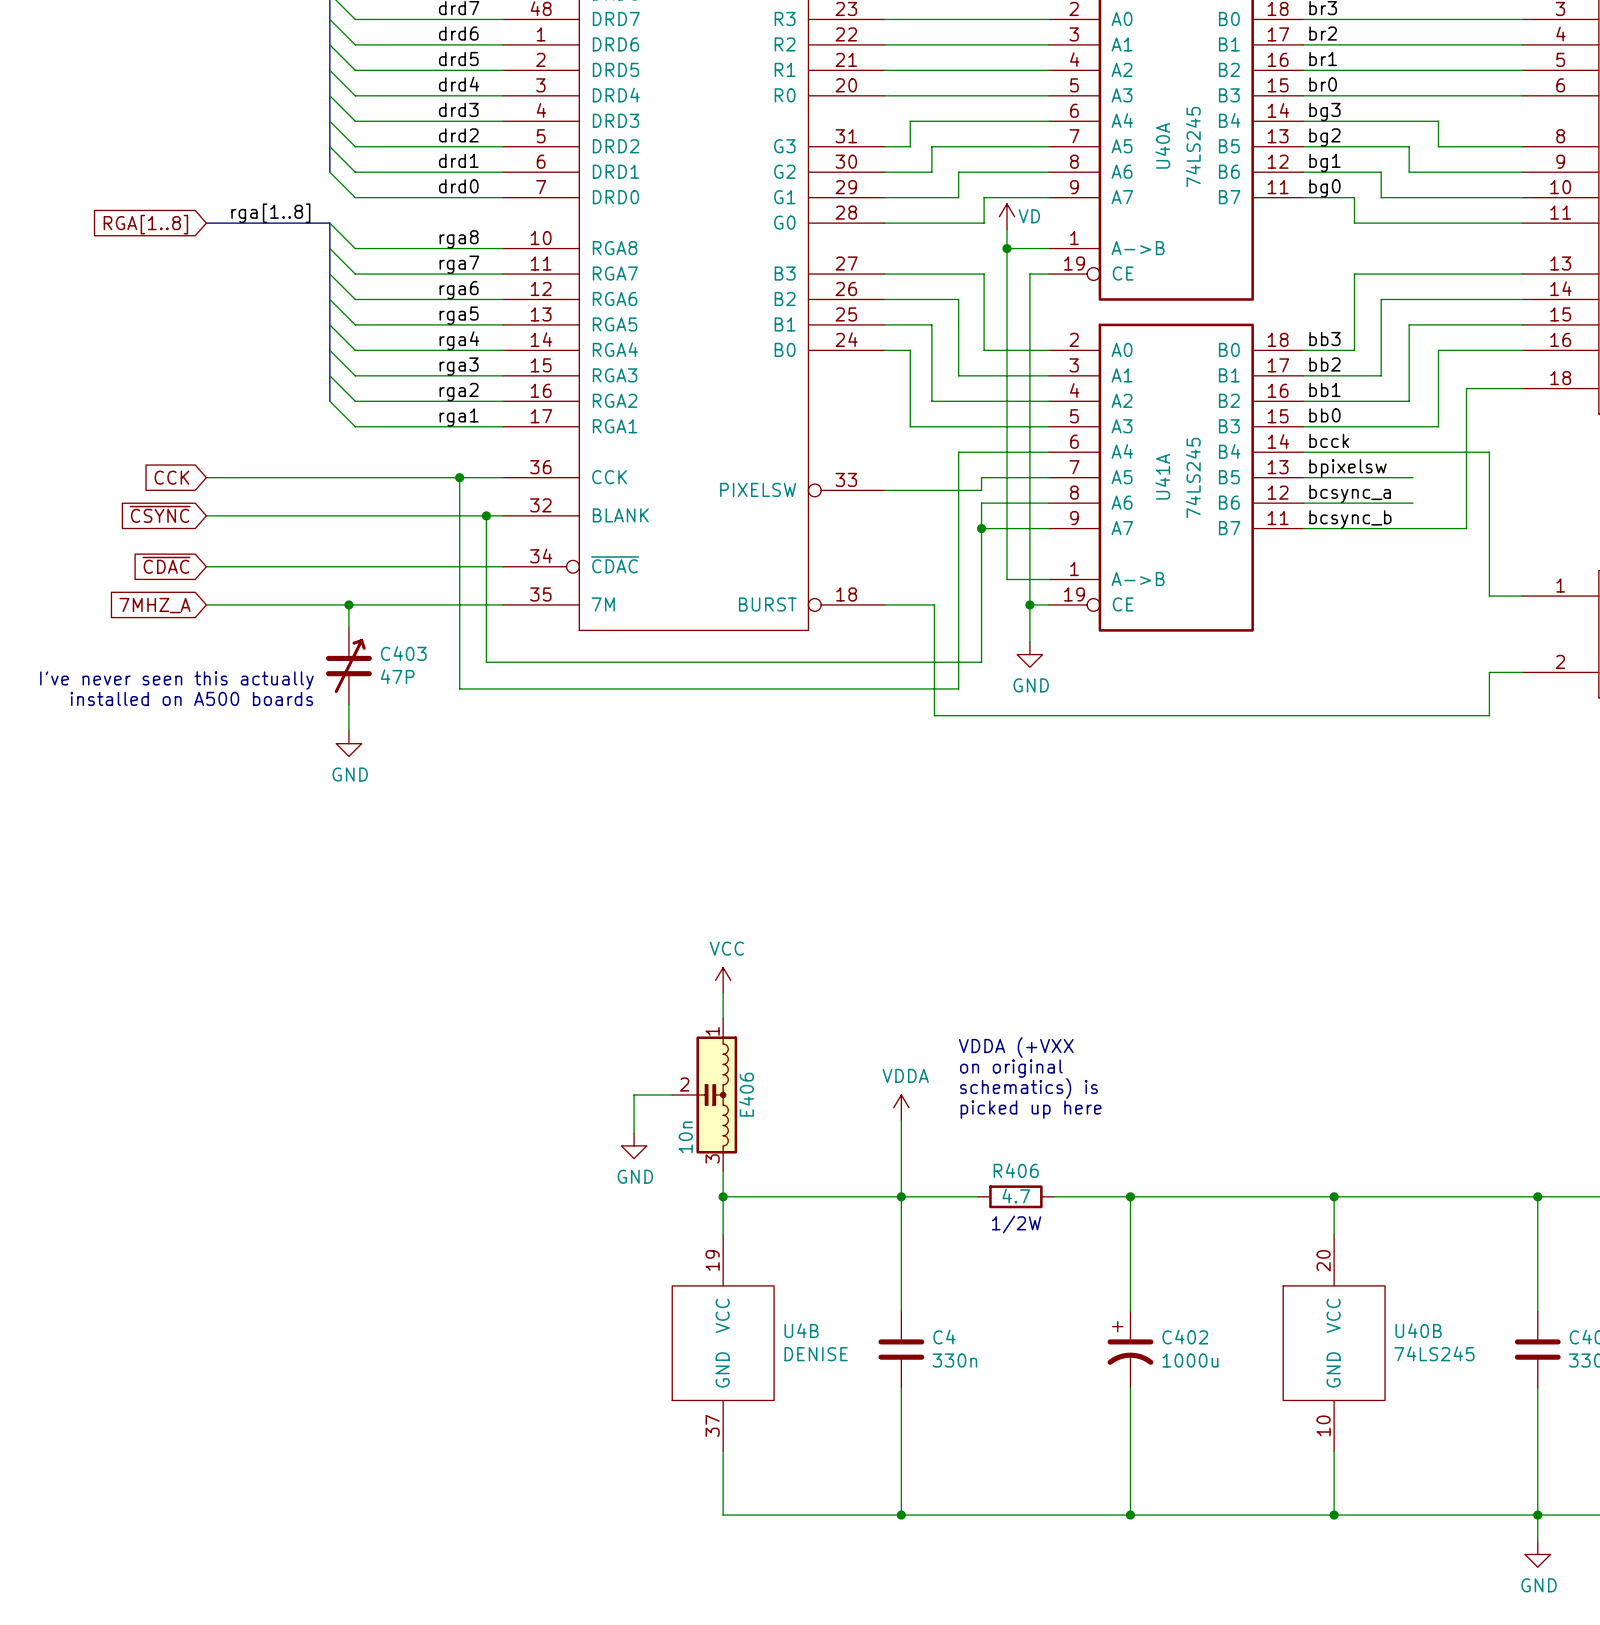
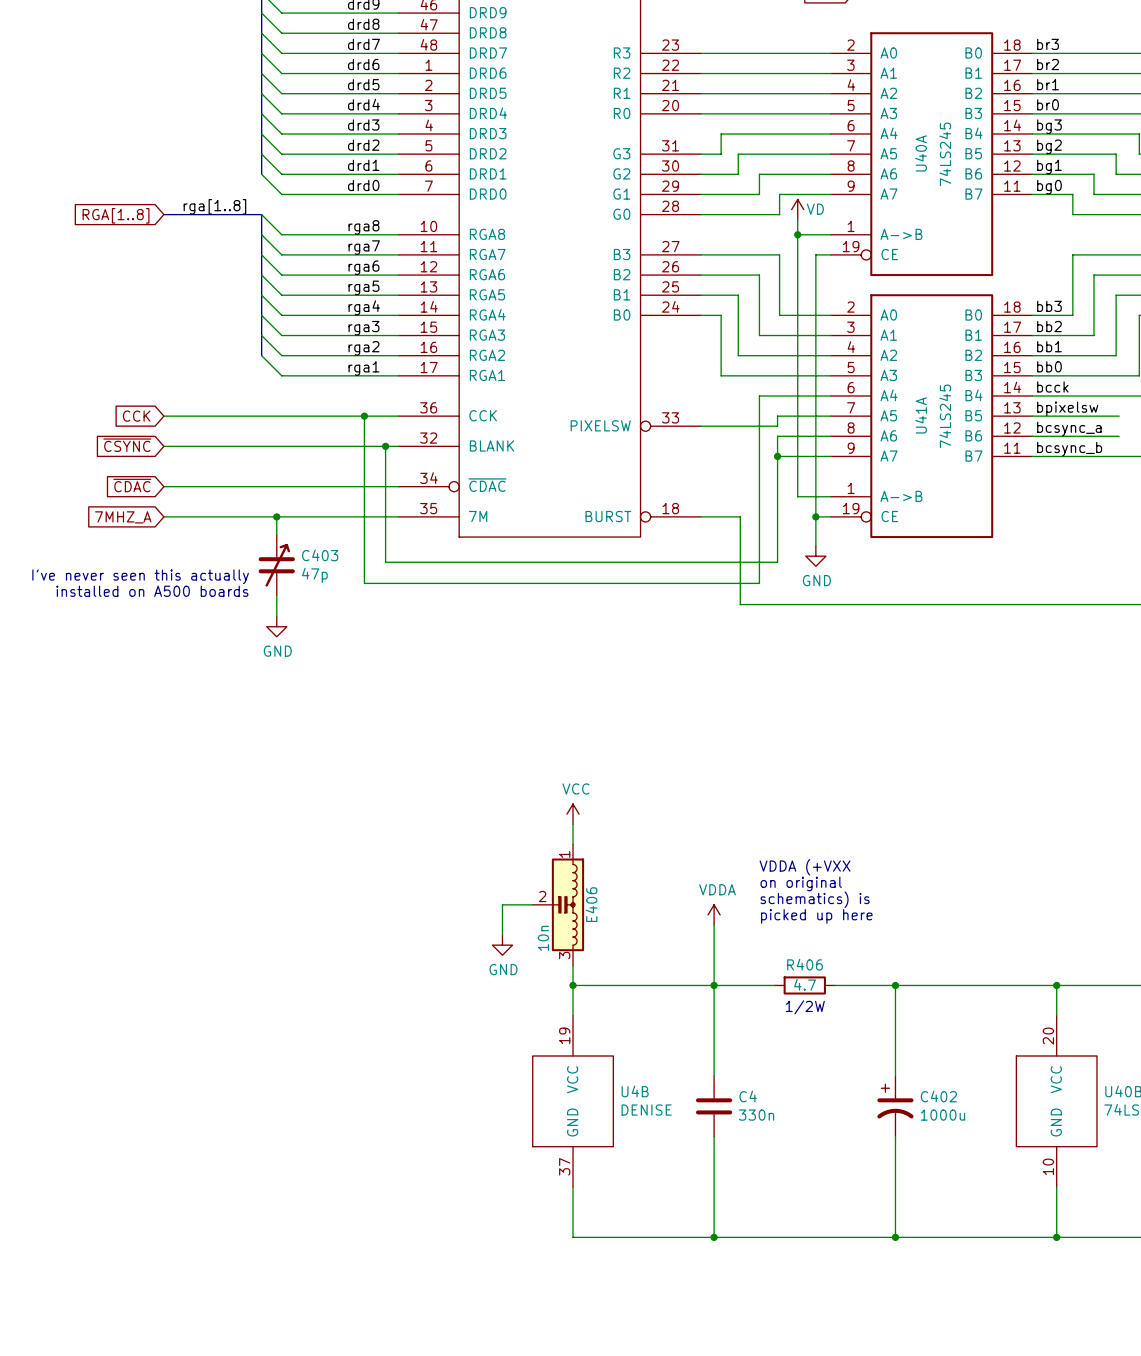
C403 value: 47P (397, 676) -> 47p (314, 575)

